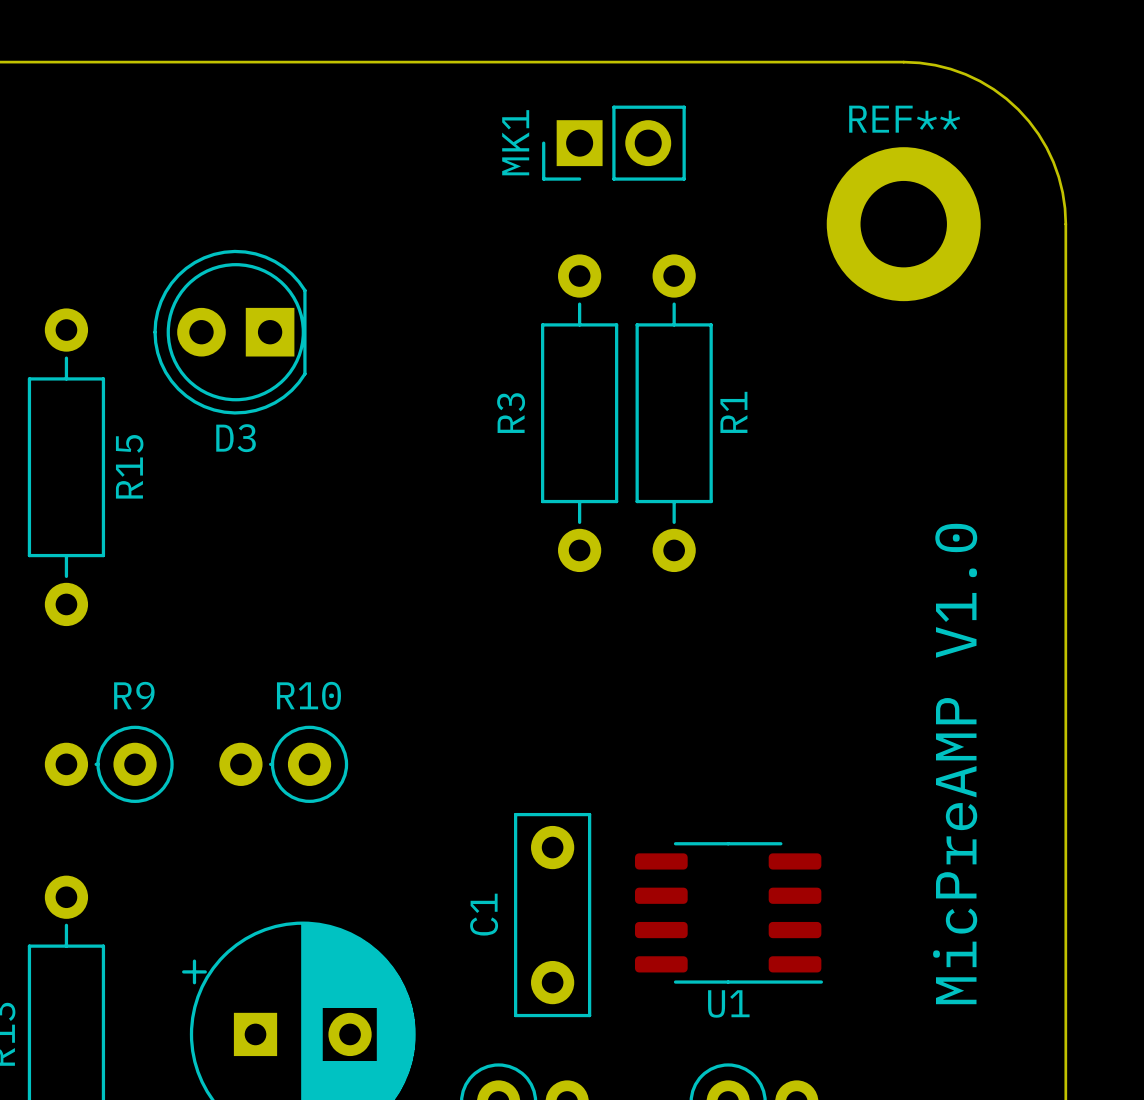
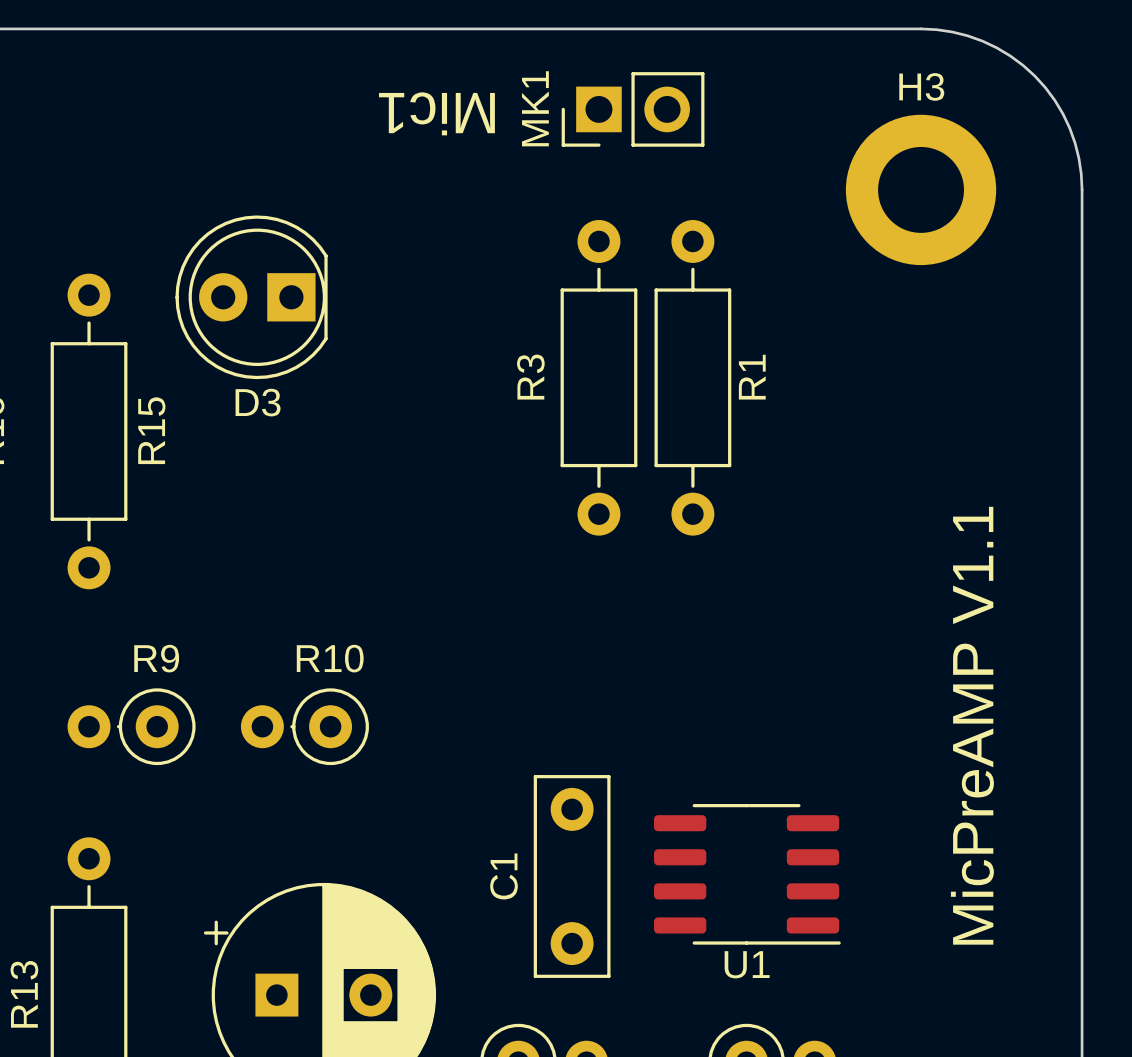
text: none -> Mic1 (436, 113)
REF**: (903, 224) -> none
H3: none -> (921, 189)
text: MicPreAMP V1.0 (955, 764) -> MicPreAMP V1.1 (972, 725)

